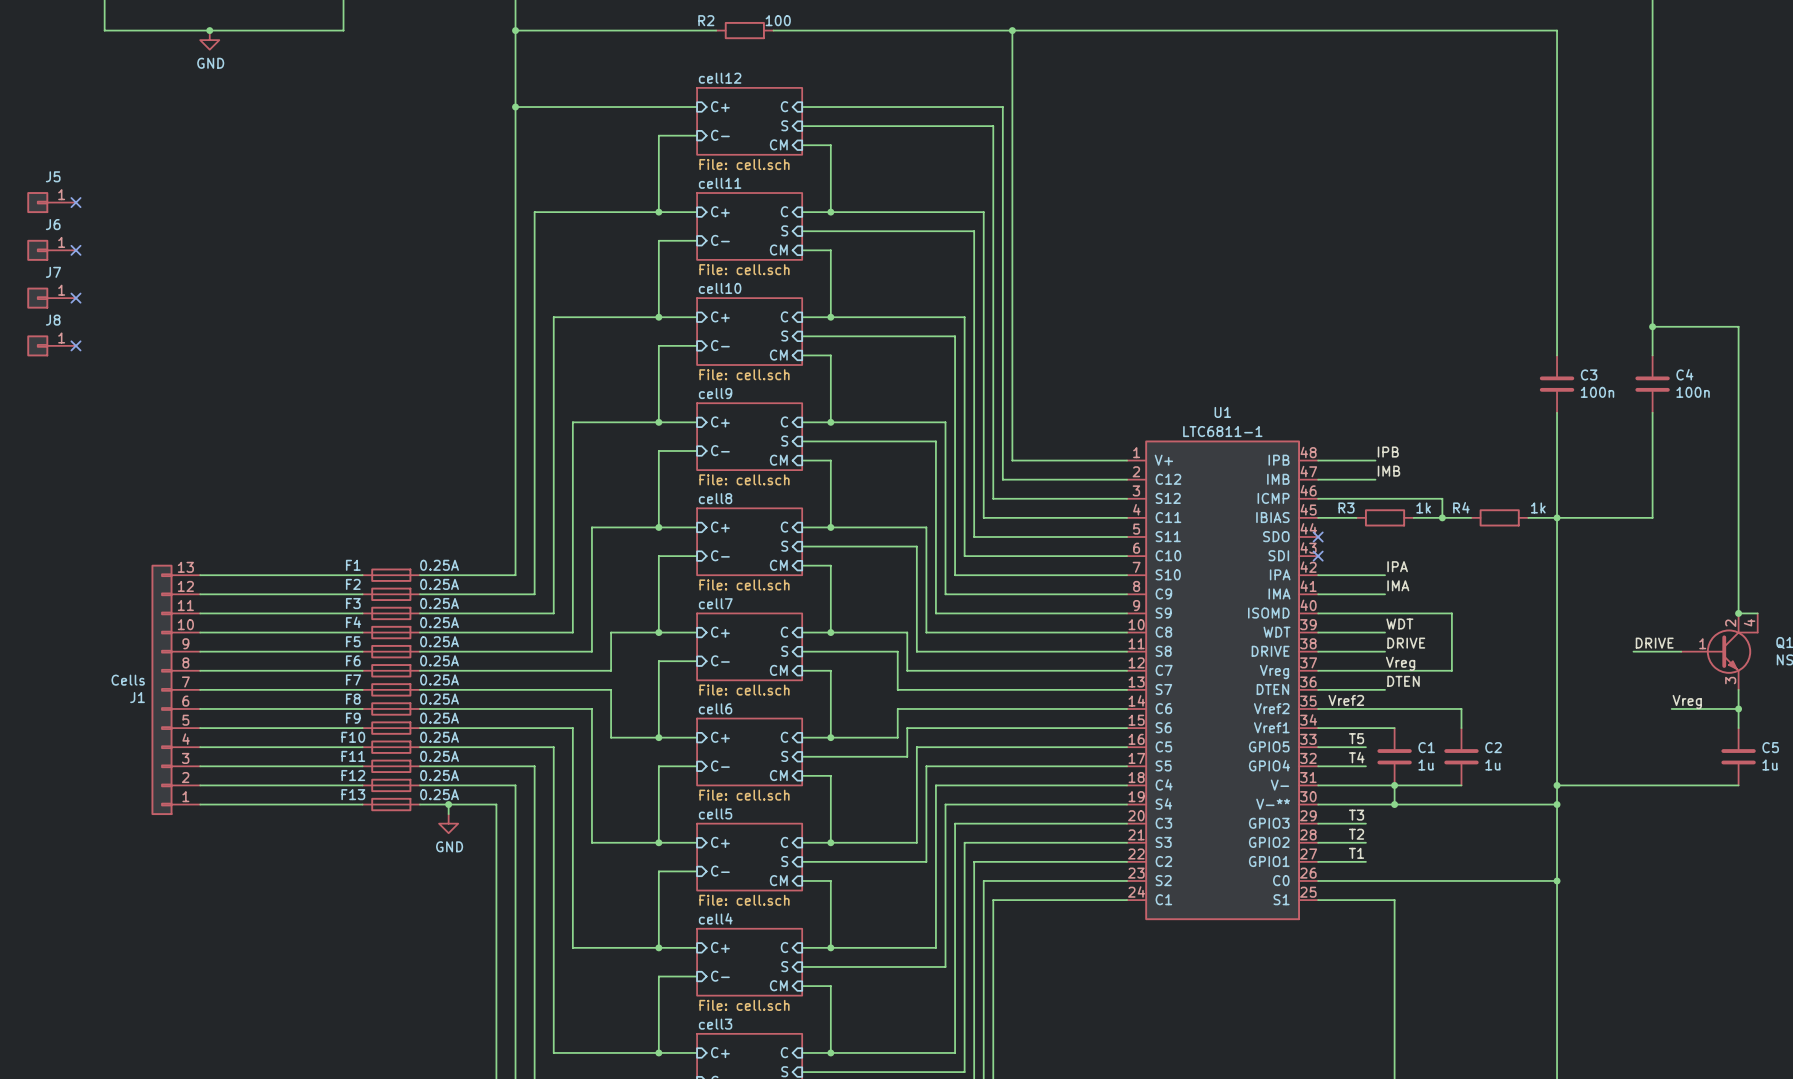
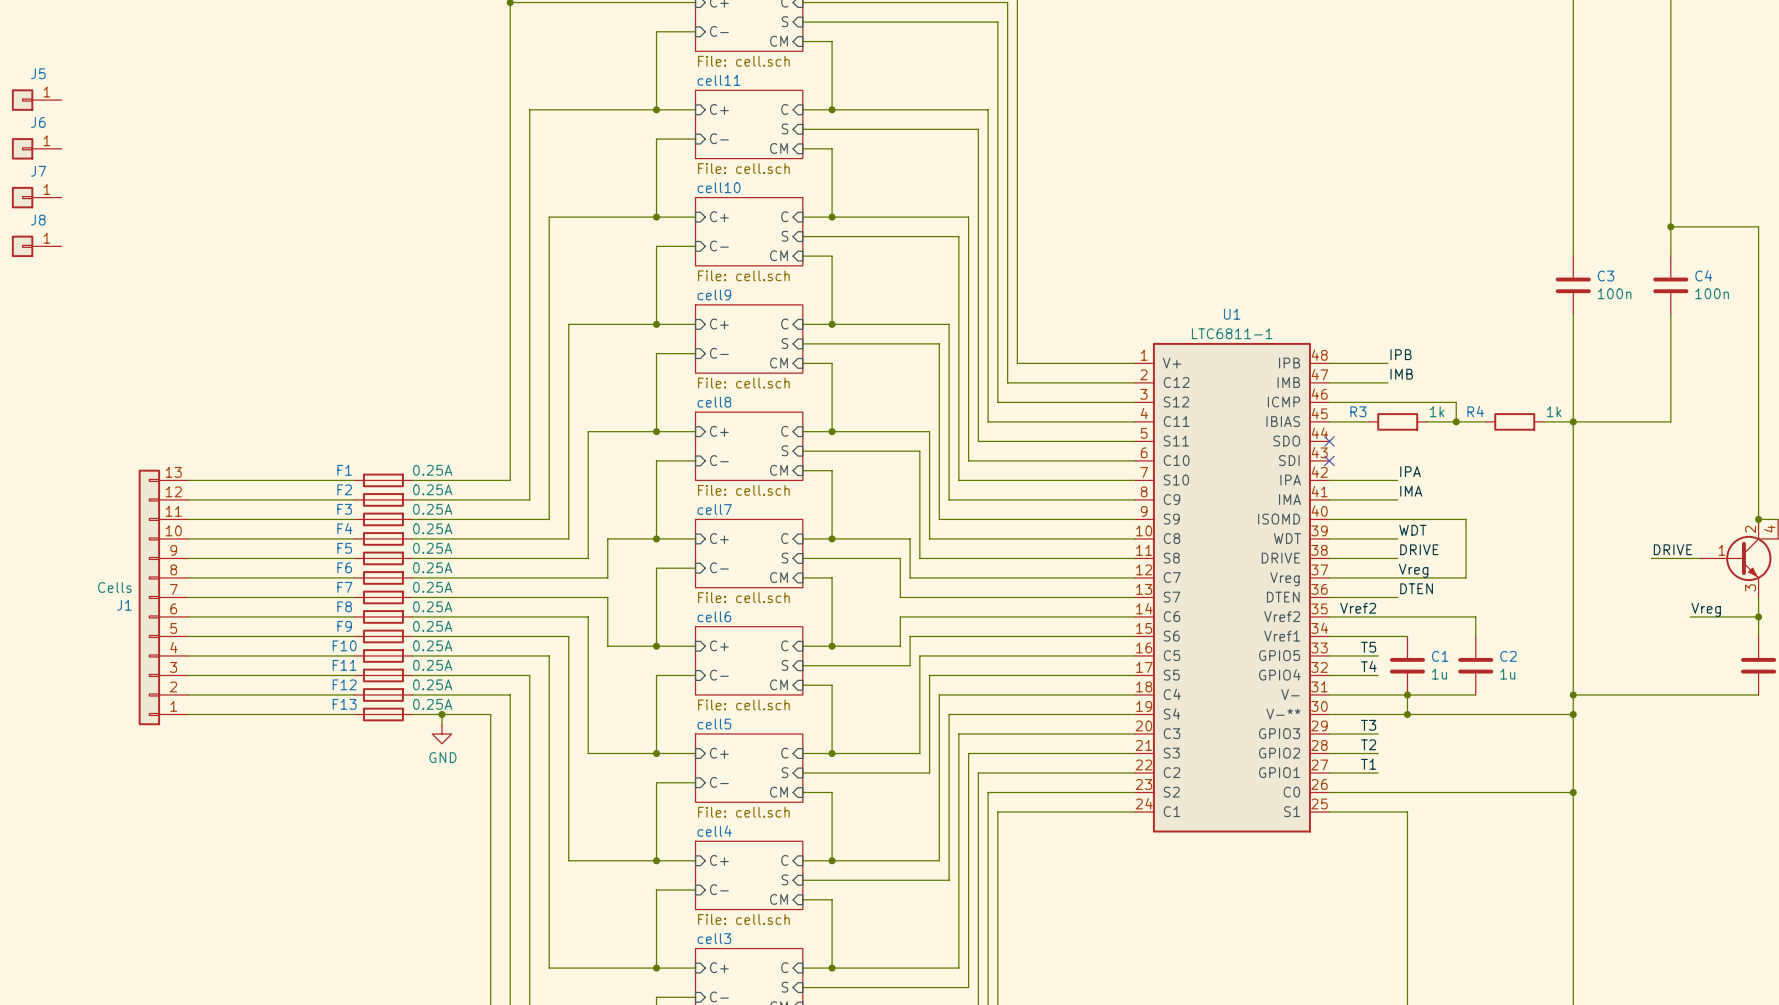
no-connect mark: (75, 202) -> none
no-connect mark: (75, 250) -> none
no-connect mark: (75, 298) -> none
no-connect mark: (75, 345) -> none

